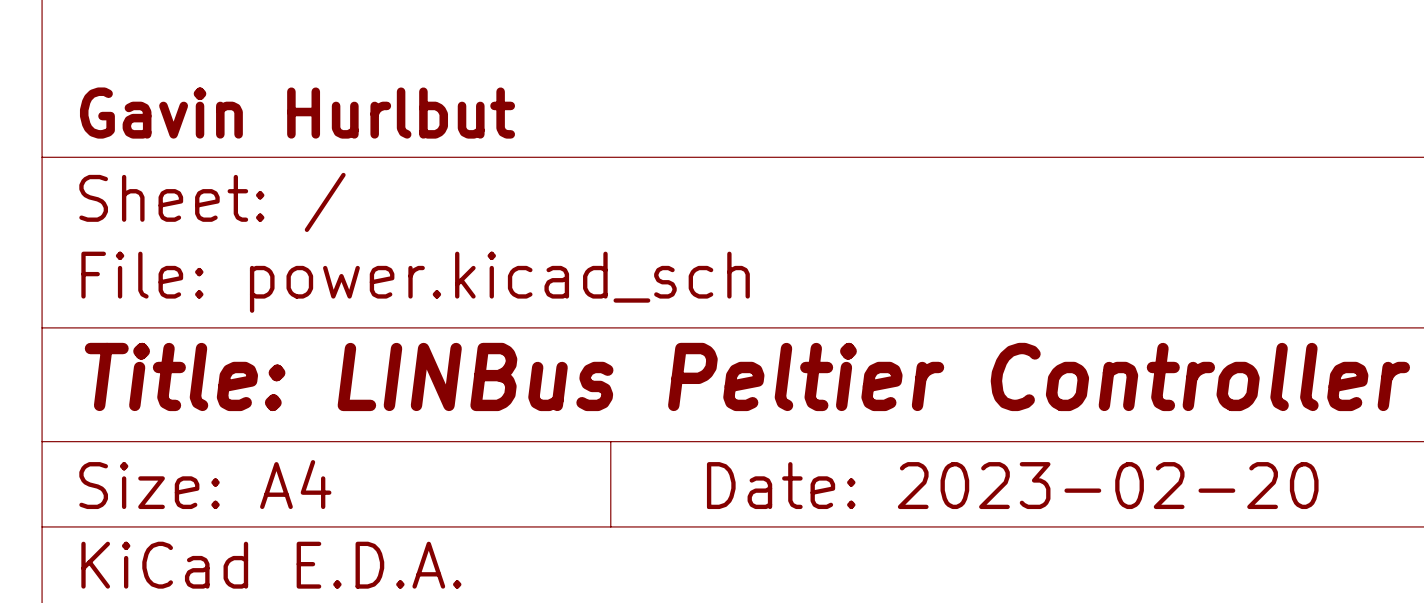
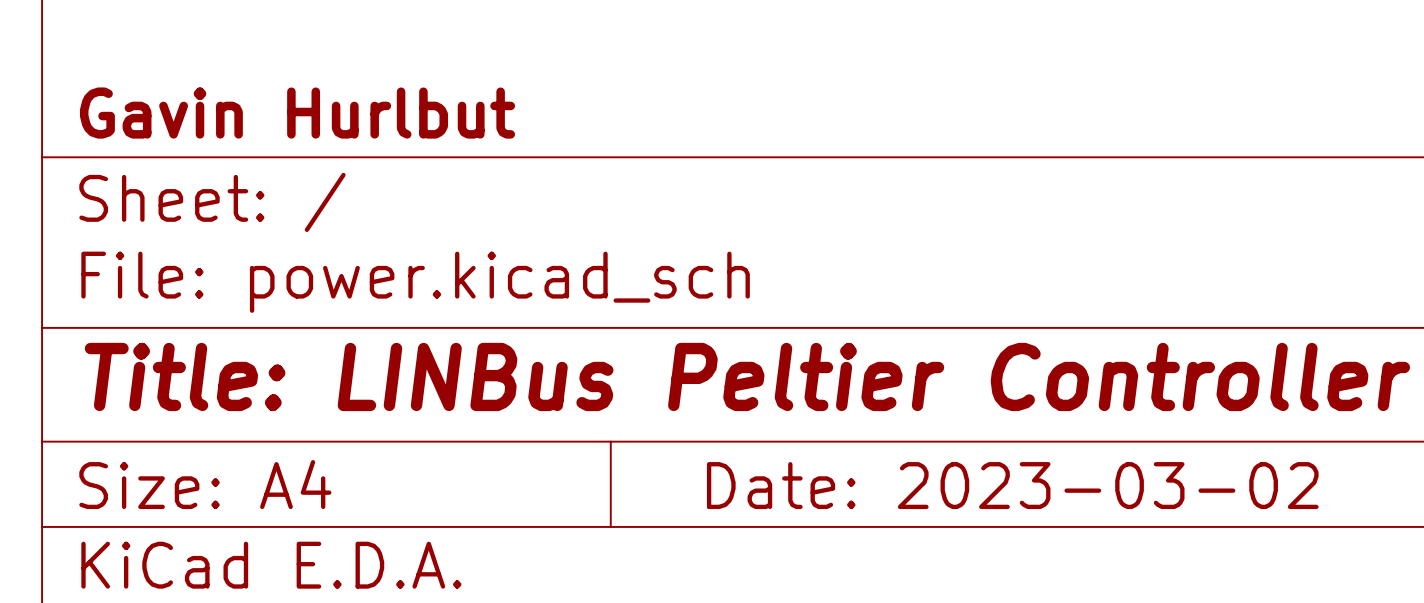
title block: Date: 2023-02-20 (1012, 485) -> Date: 2023-03-02 (1012, 485)

